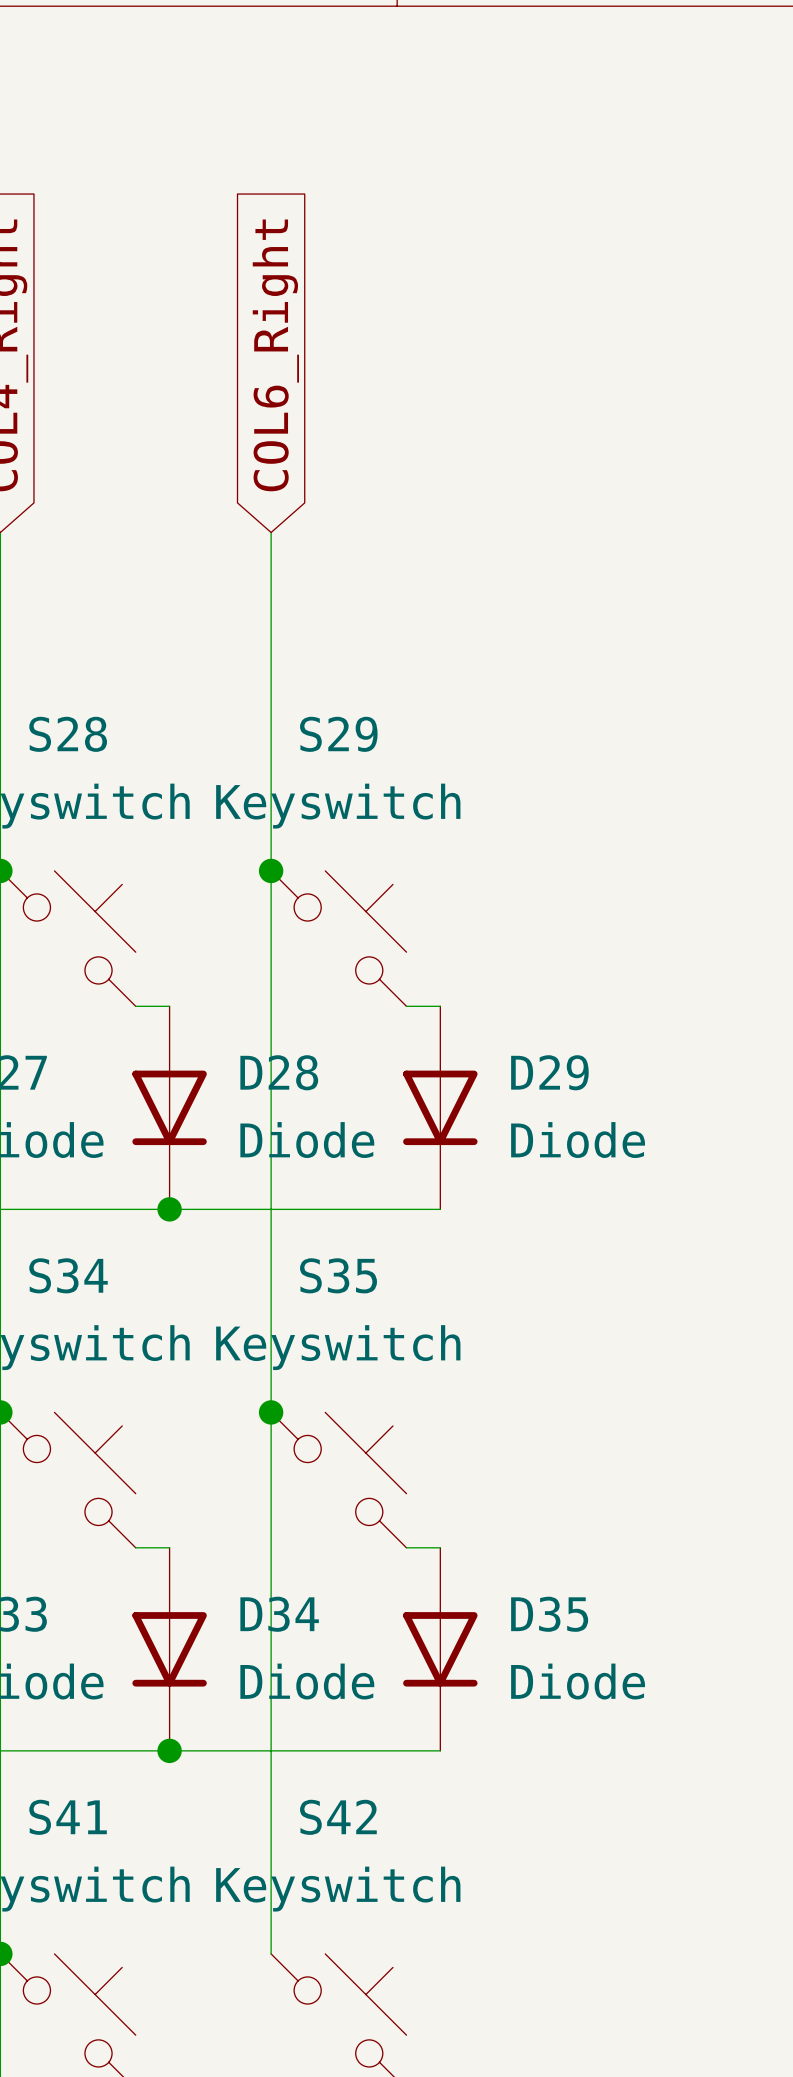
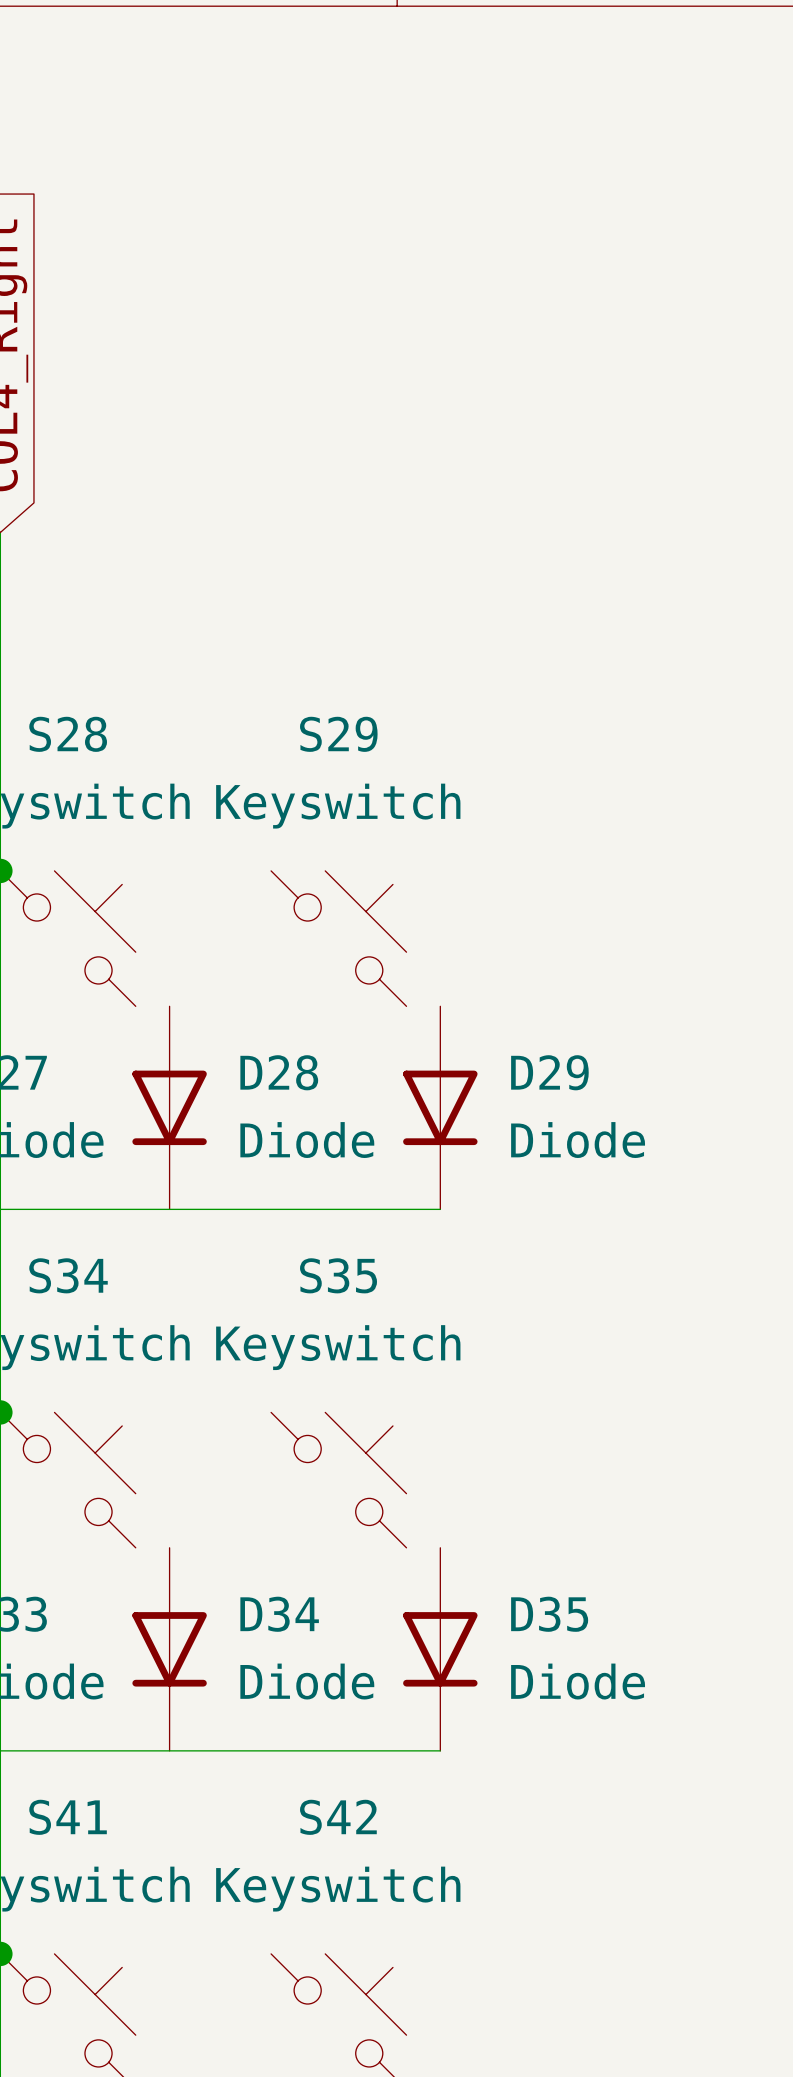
global label: COL6_Right (275, 355) -> none
wire: (271, 532) (271, 1953) -> none
junction: (271, 870) -> none
wire: (135, 1006) (169, 1006) -> none
wire: (406, 1006) (440, 1006) -> none
junction: (169, 1209) -> none
junction: (271, 1412) -> none
wire: (135, 1547) (169, 1547) -> none
wire: (406, 1547) (440, 1547) -> none
junction: (169, 1750) -> none

